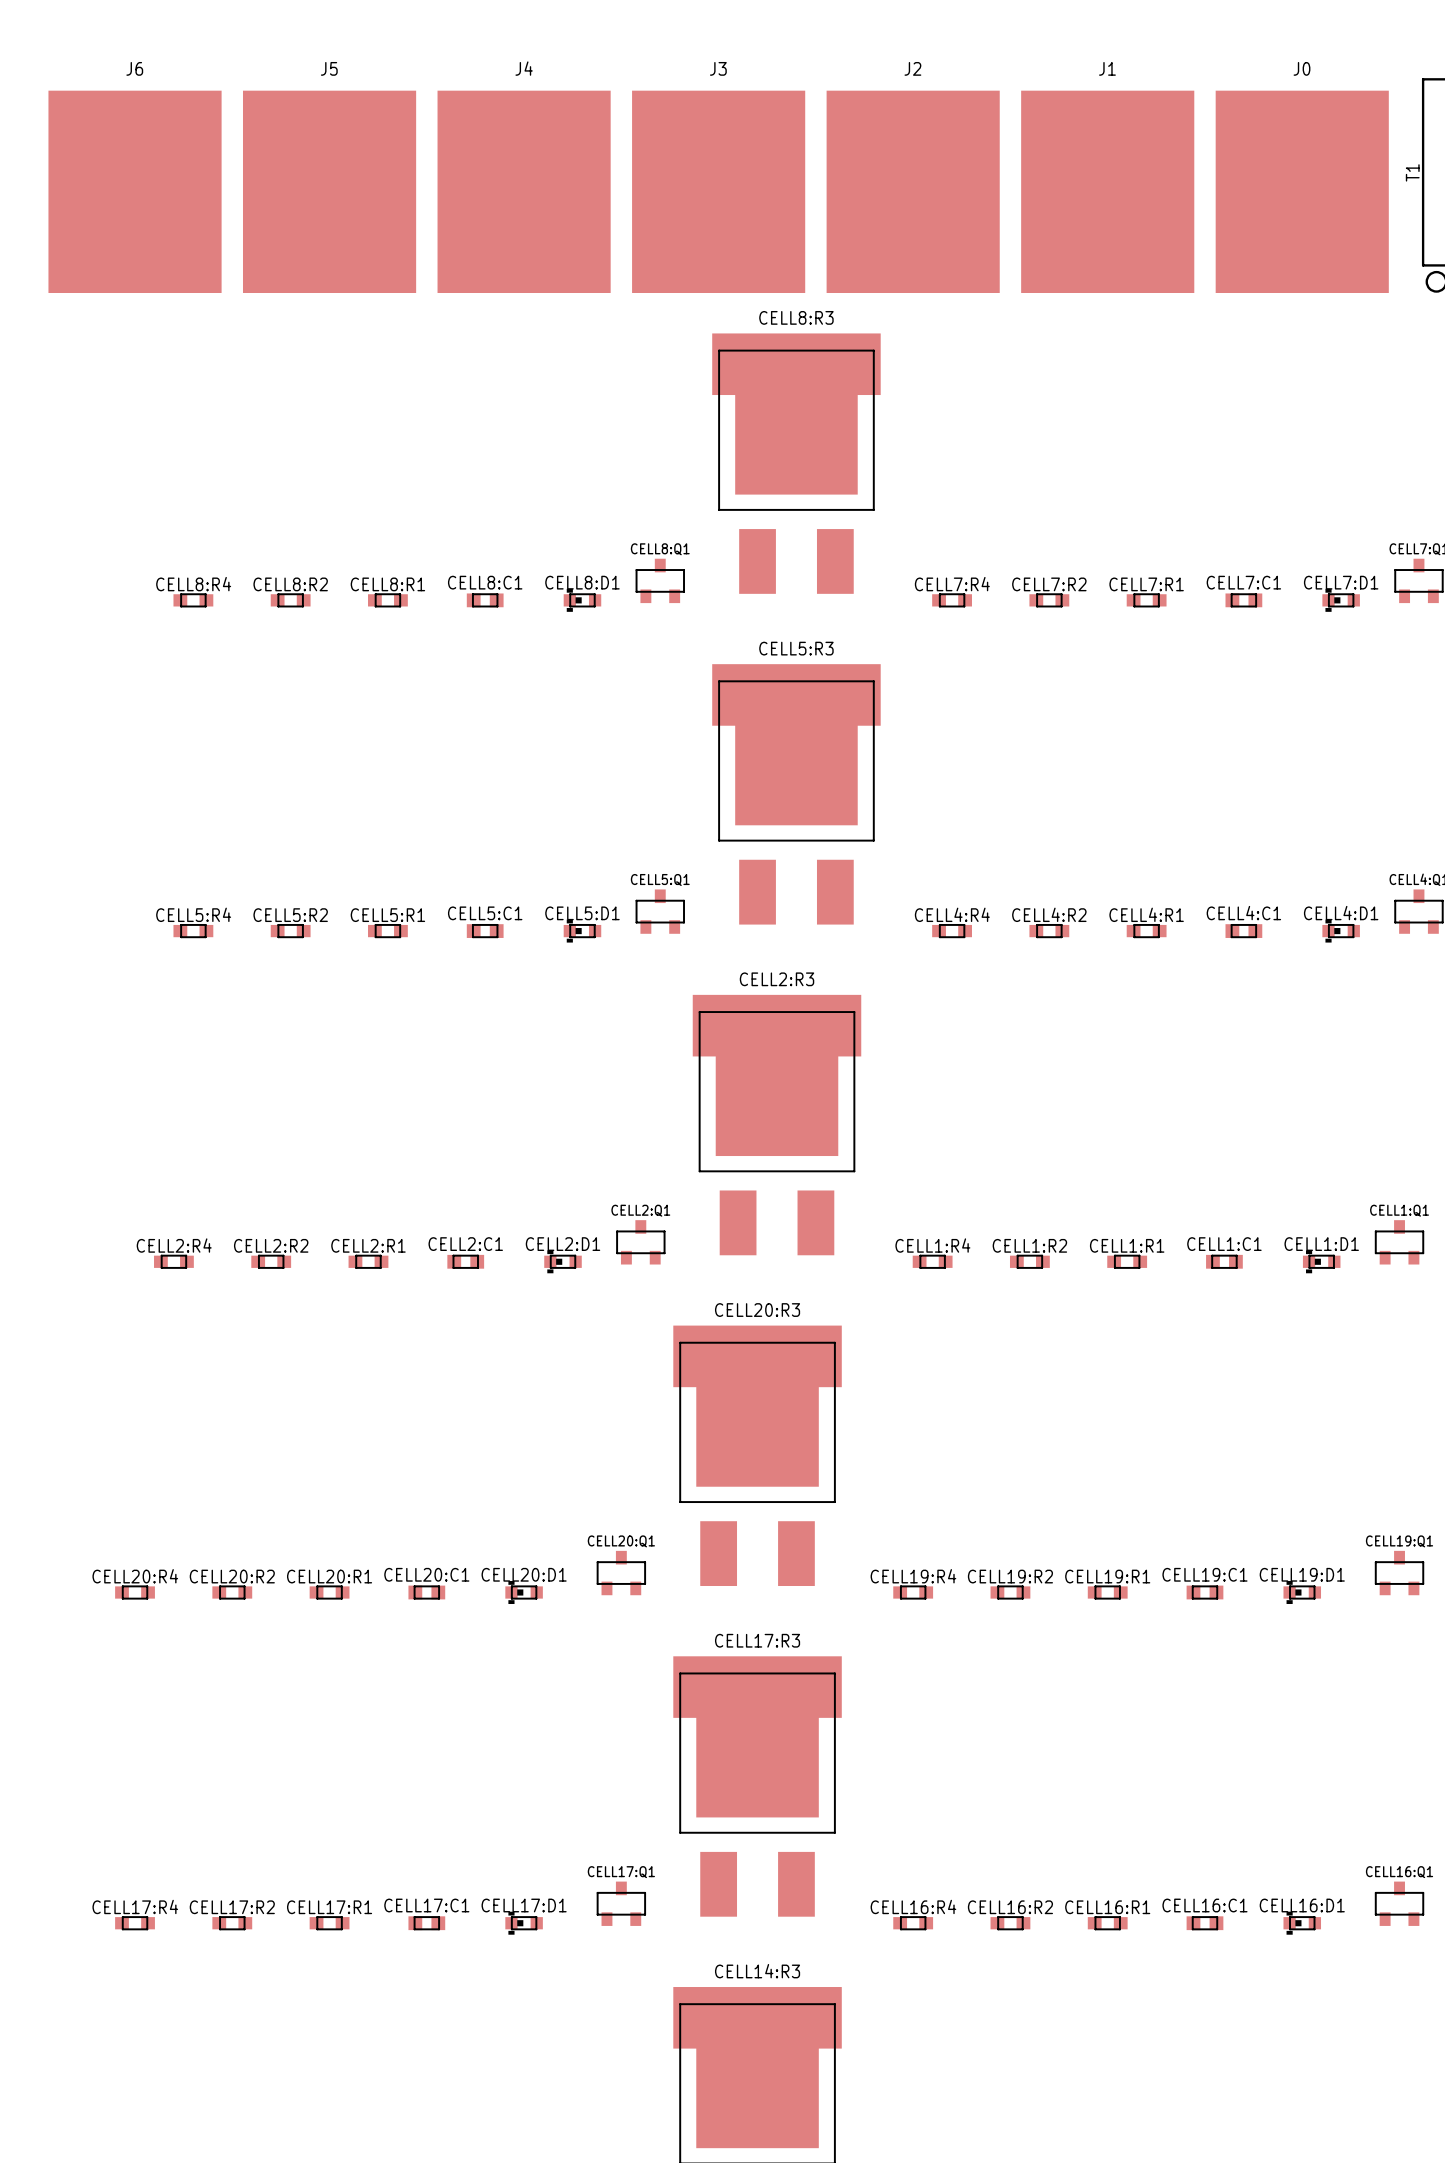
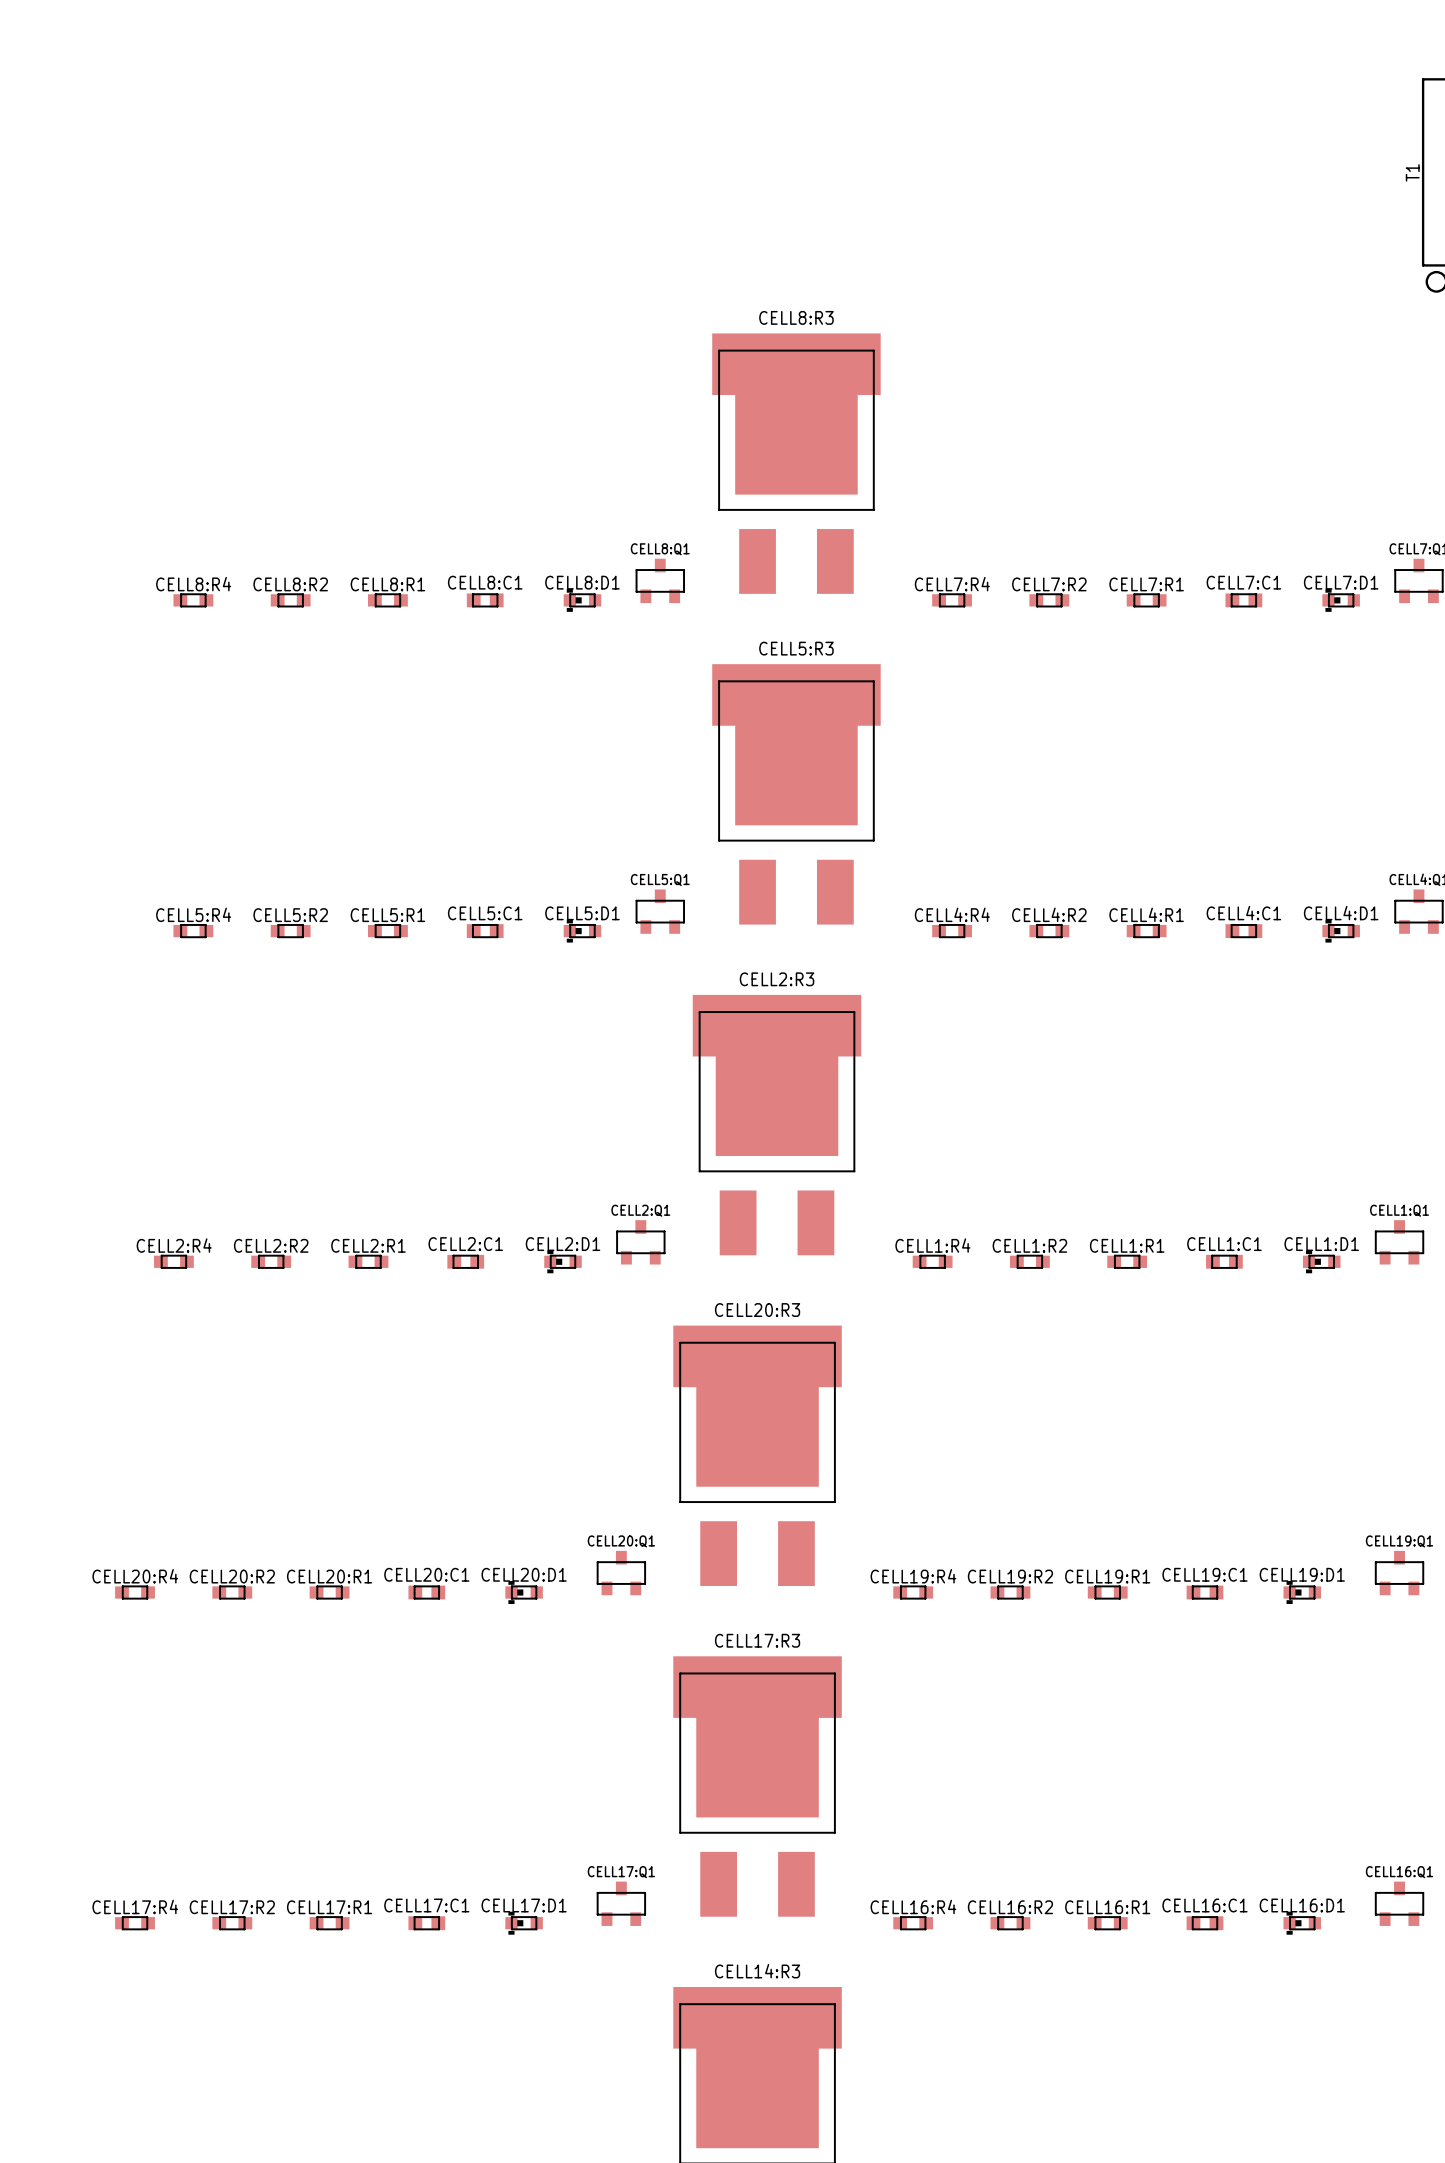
J6: (135, 191) -> none
J5: (329, 191) -> none
J4: (524, 191) -> none
J3: (718, 191) -> none
J2: (913, 191) -> none
J1: (1107, 191) -> none
J0: (1302, 191) -> none

